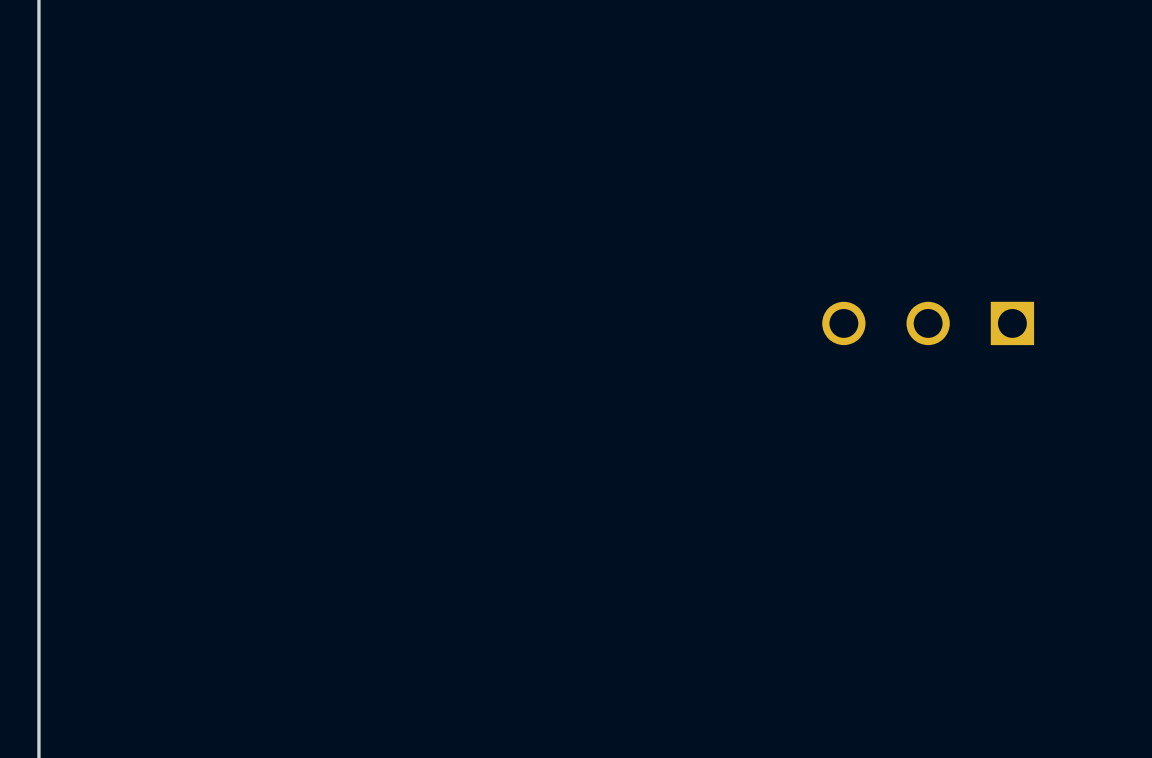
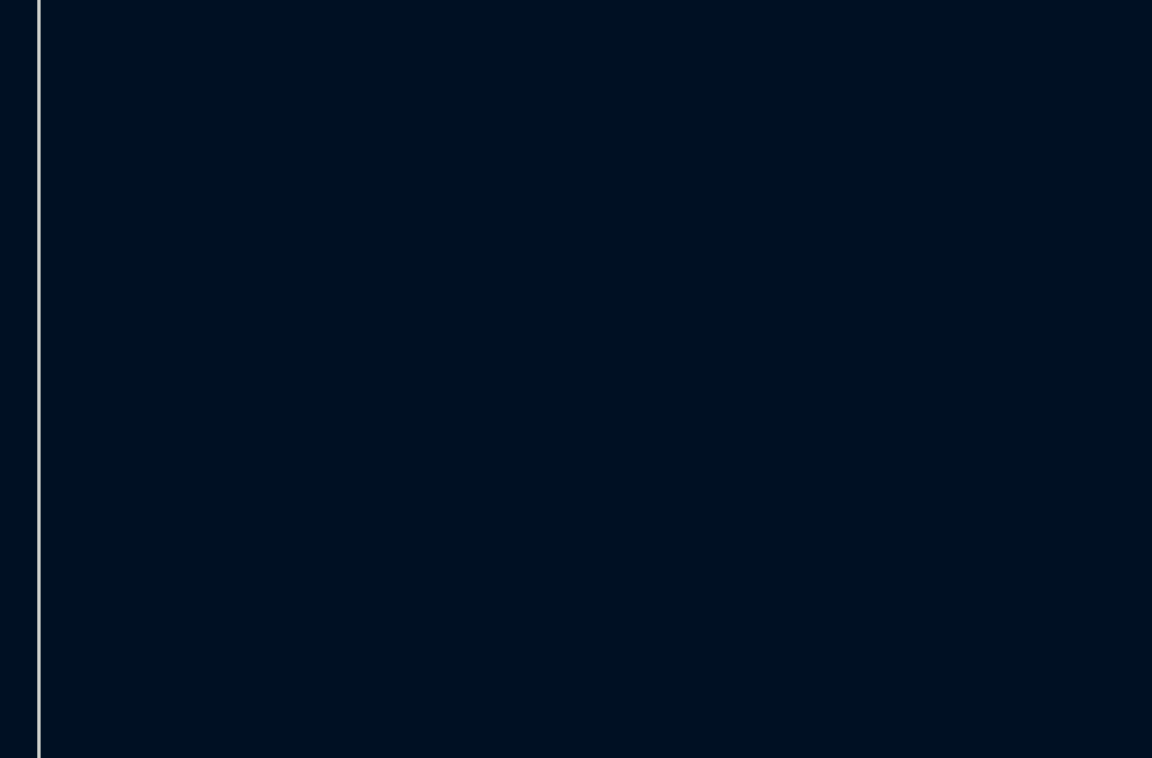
part: (928, 323) -> none

